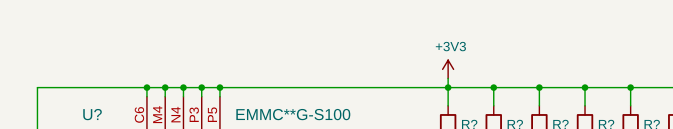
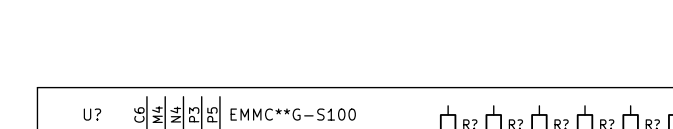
power symbol: +3V3 (448, 69) -> none
wire: (448, 78) (448, 105) -> none
wire: (146, 87) (146, 96) -> none
junction: (146, 87) -> none
wire: (165, 87) (165, 96) -> none
junction: (165, 87) -> none
wire: (183, 87) (183, 96) -> none
junction: (183, 87) -> none
wire: (201, 87) (201, 96) -> none
junction: (201, 87) -> none
wire: (219, 87) (219, 96) -> none
junction: (219, 87) -> none
junction: (448, 87) -> none
wire: (493, 87) (493, 105) -> none
junction: (493, 87) -> none
wire: (539, 87) (539, 105) -> none
junction: (539, 87) -> none
wire: (585, 87) (585, 105) -> none
junction: (585, 87) -> none
wire: (630, 87) (630, 105) -> none
junction: (630, 87) -> none

